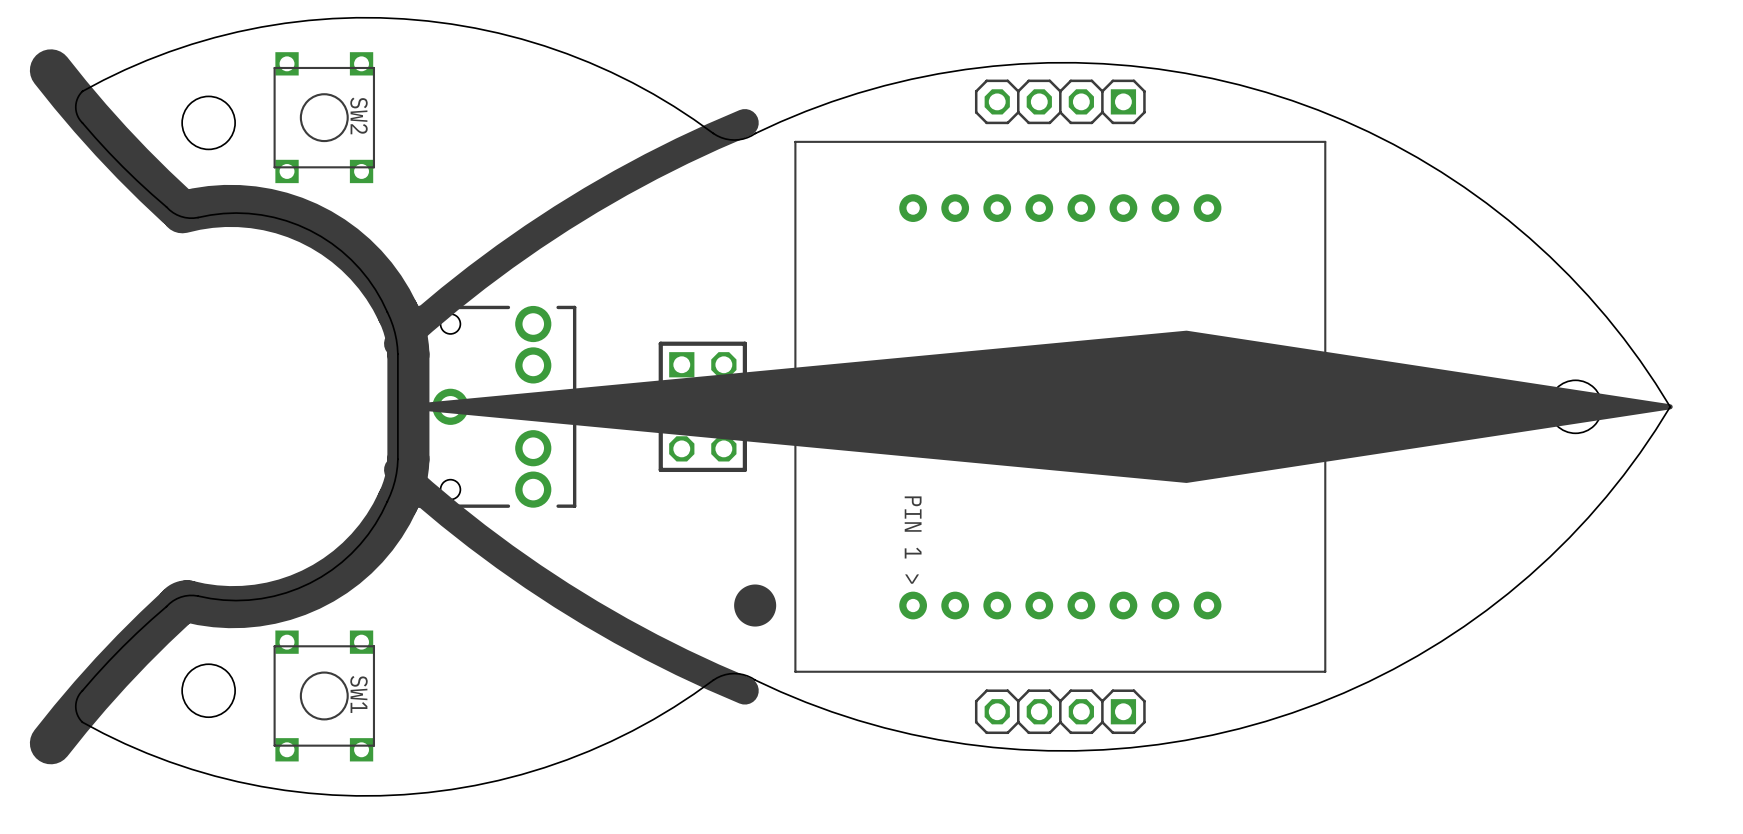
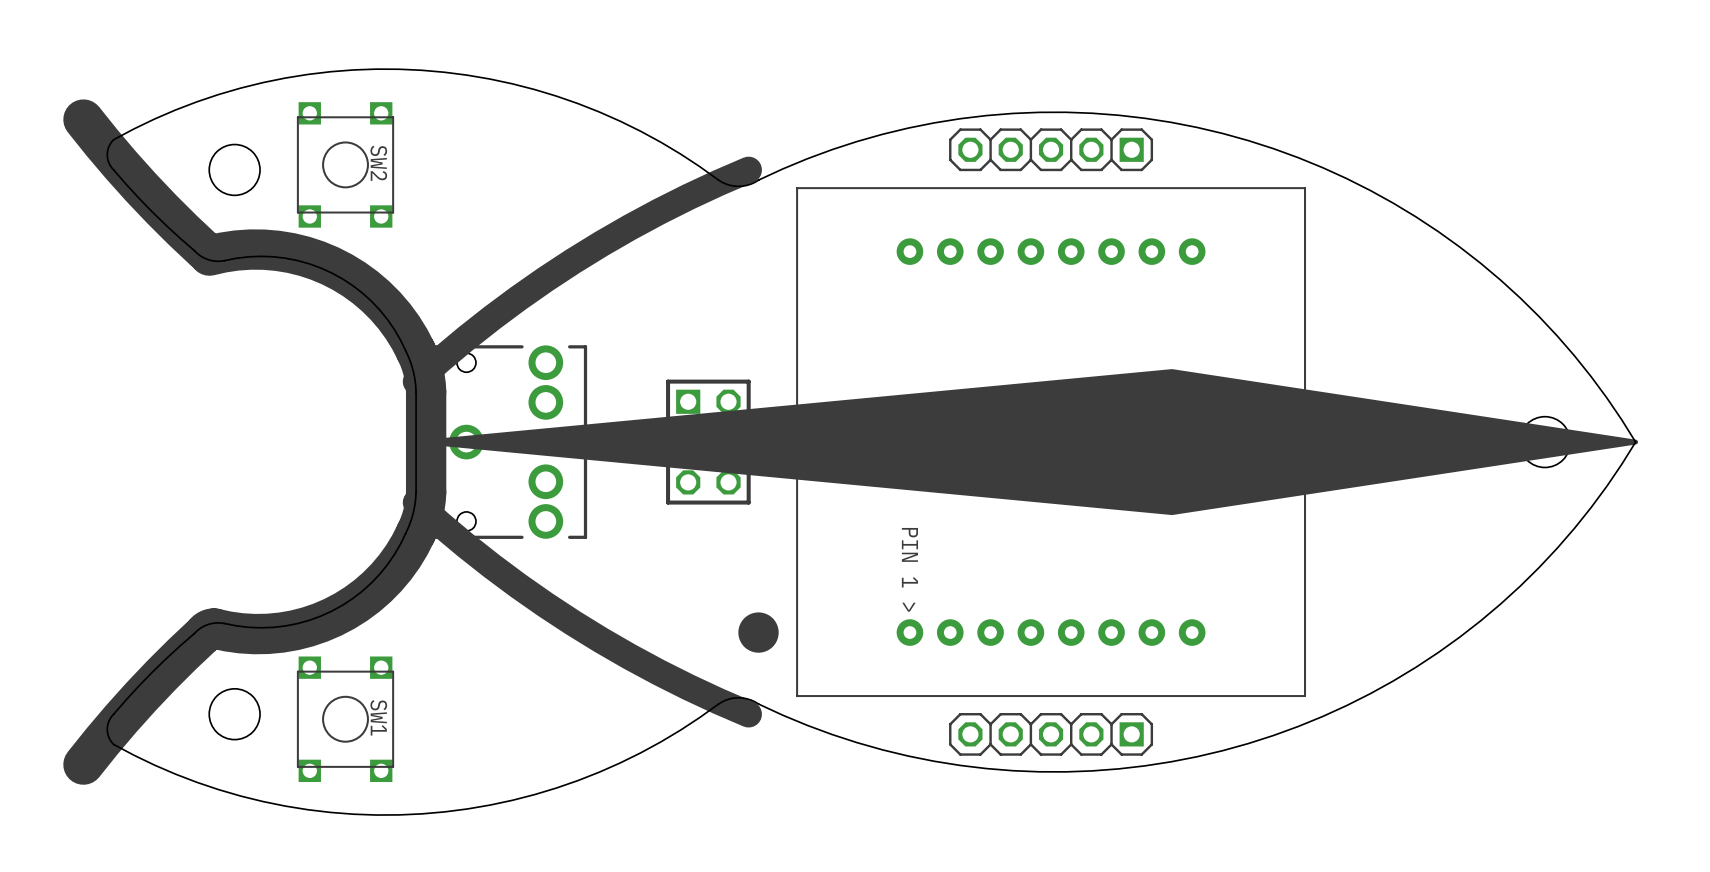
part footprint: [974, 79, 1146, 125] -> [949, 128, 1154, 172]
part footprint: [974, 689, 1146, 735] -> [949, 713, 1154, 756]

